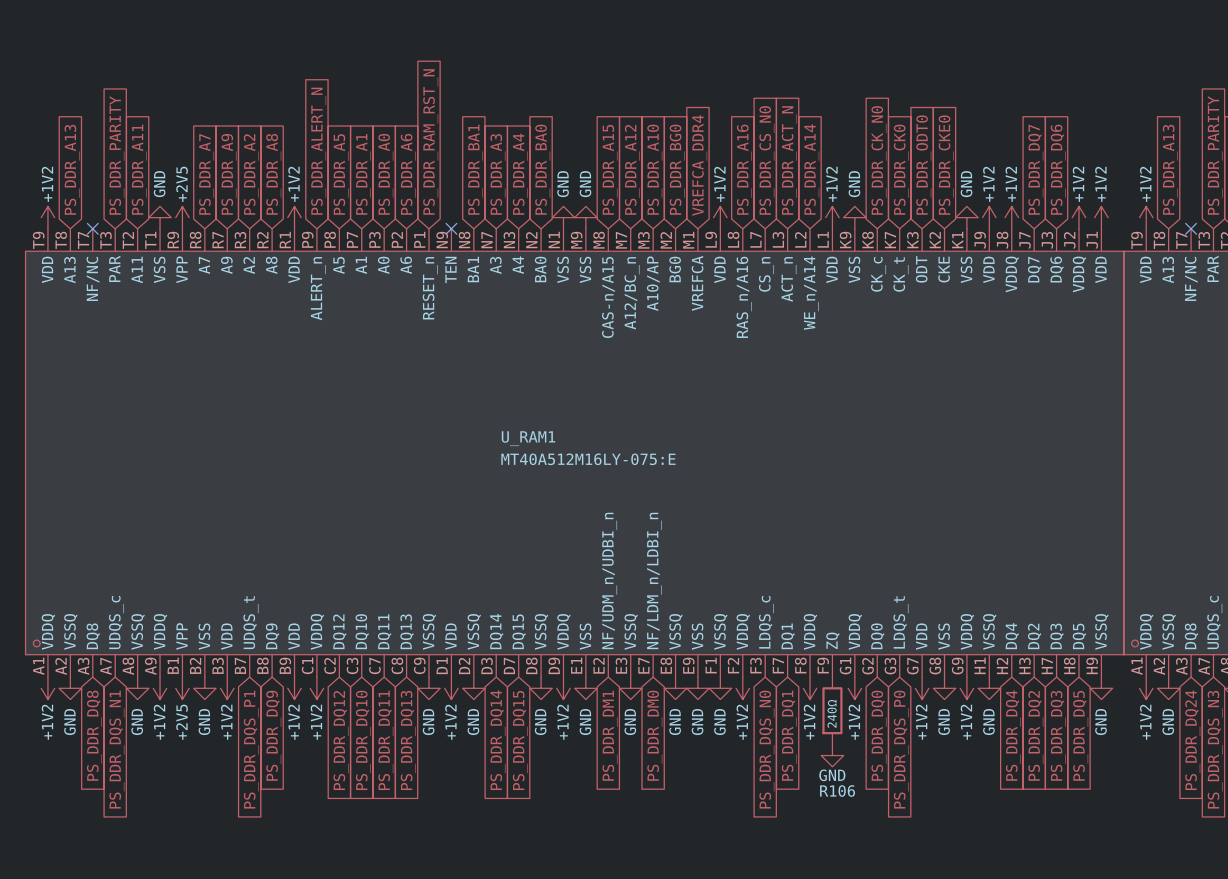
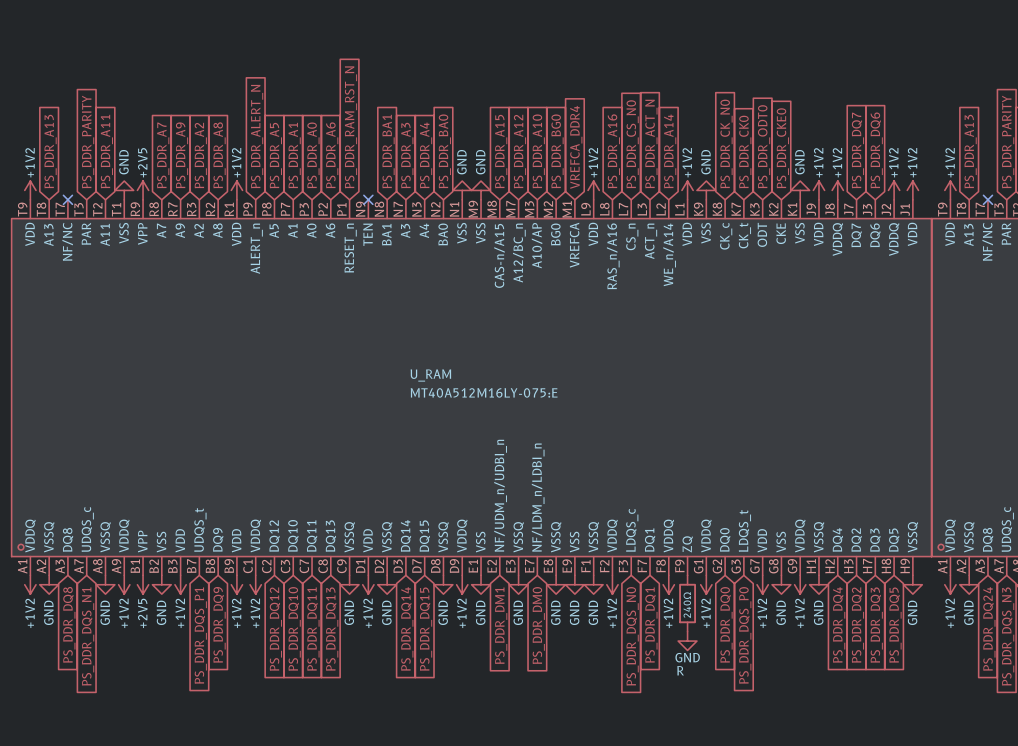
U_RAM1 name: U_RAM1 (528, 438) -> U_RAM (430, 375)
R106 name: R106 (837, 791) -> R (680, 670)

